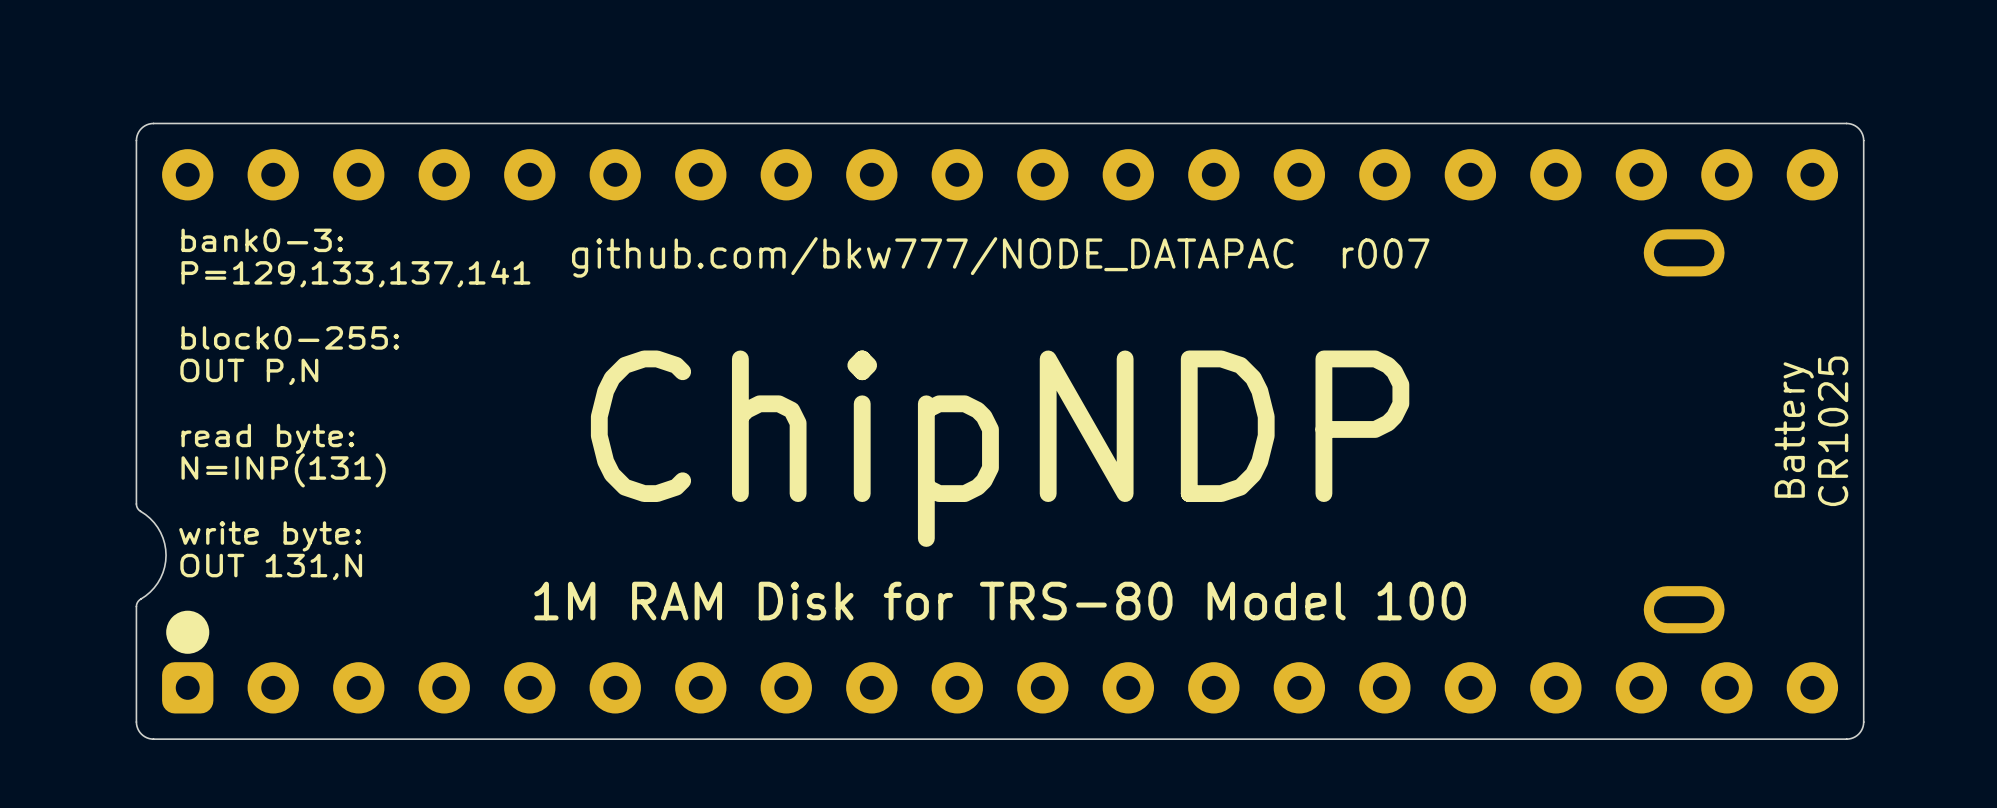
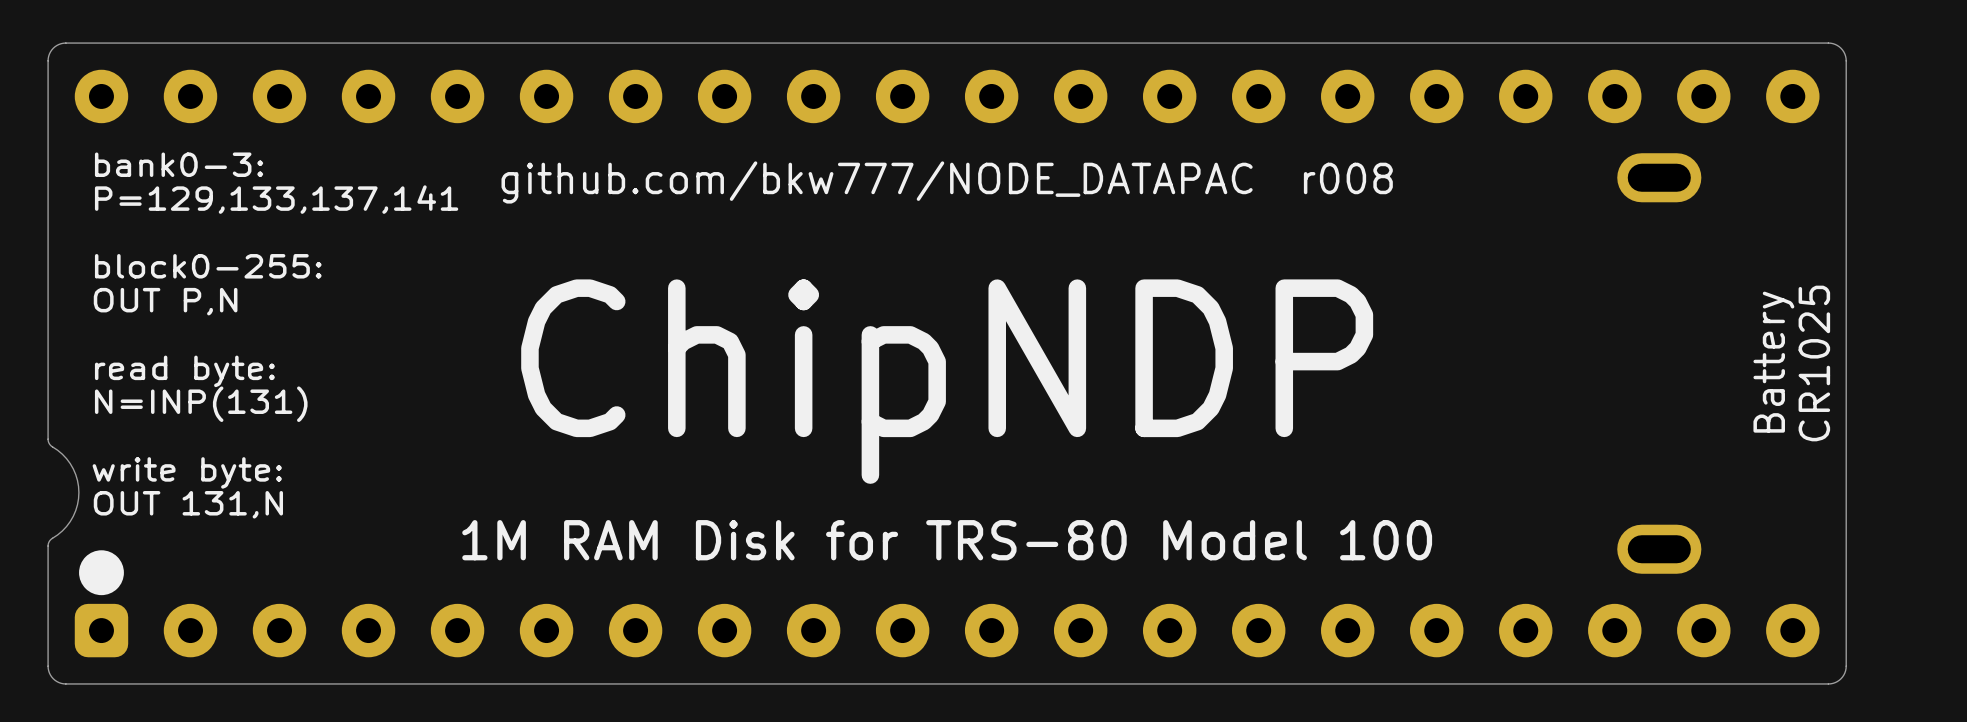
text: github.com/bkw777/NODE_DATAPAC r007 (1000, 257) -> github.com/bkw777/NODE_DATAPAC r008 (947, 182)

